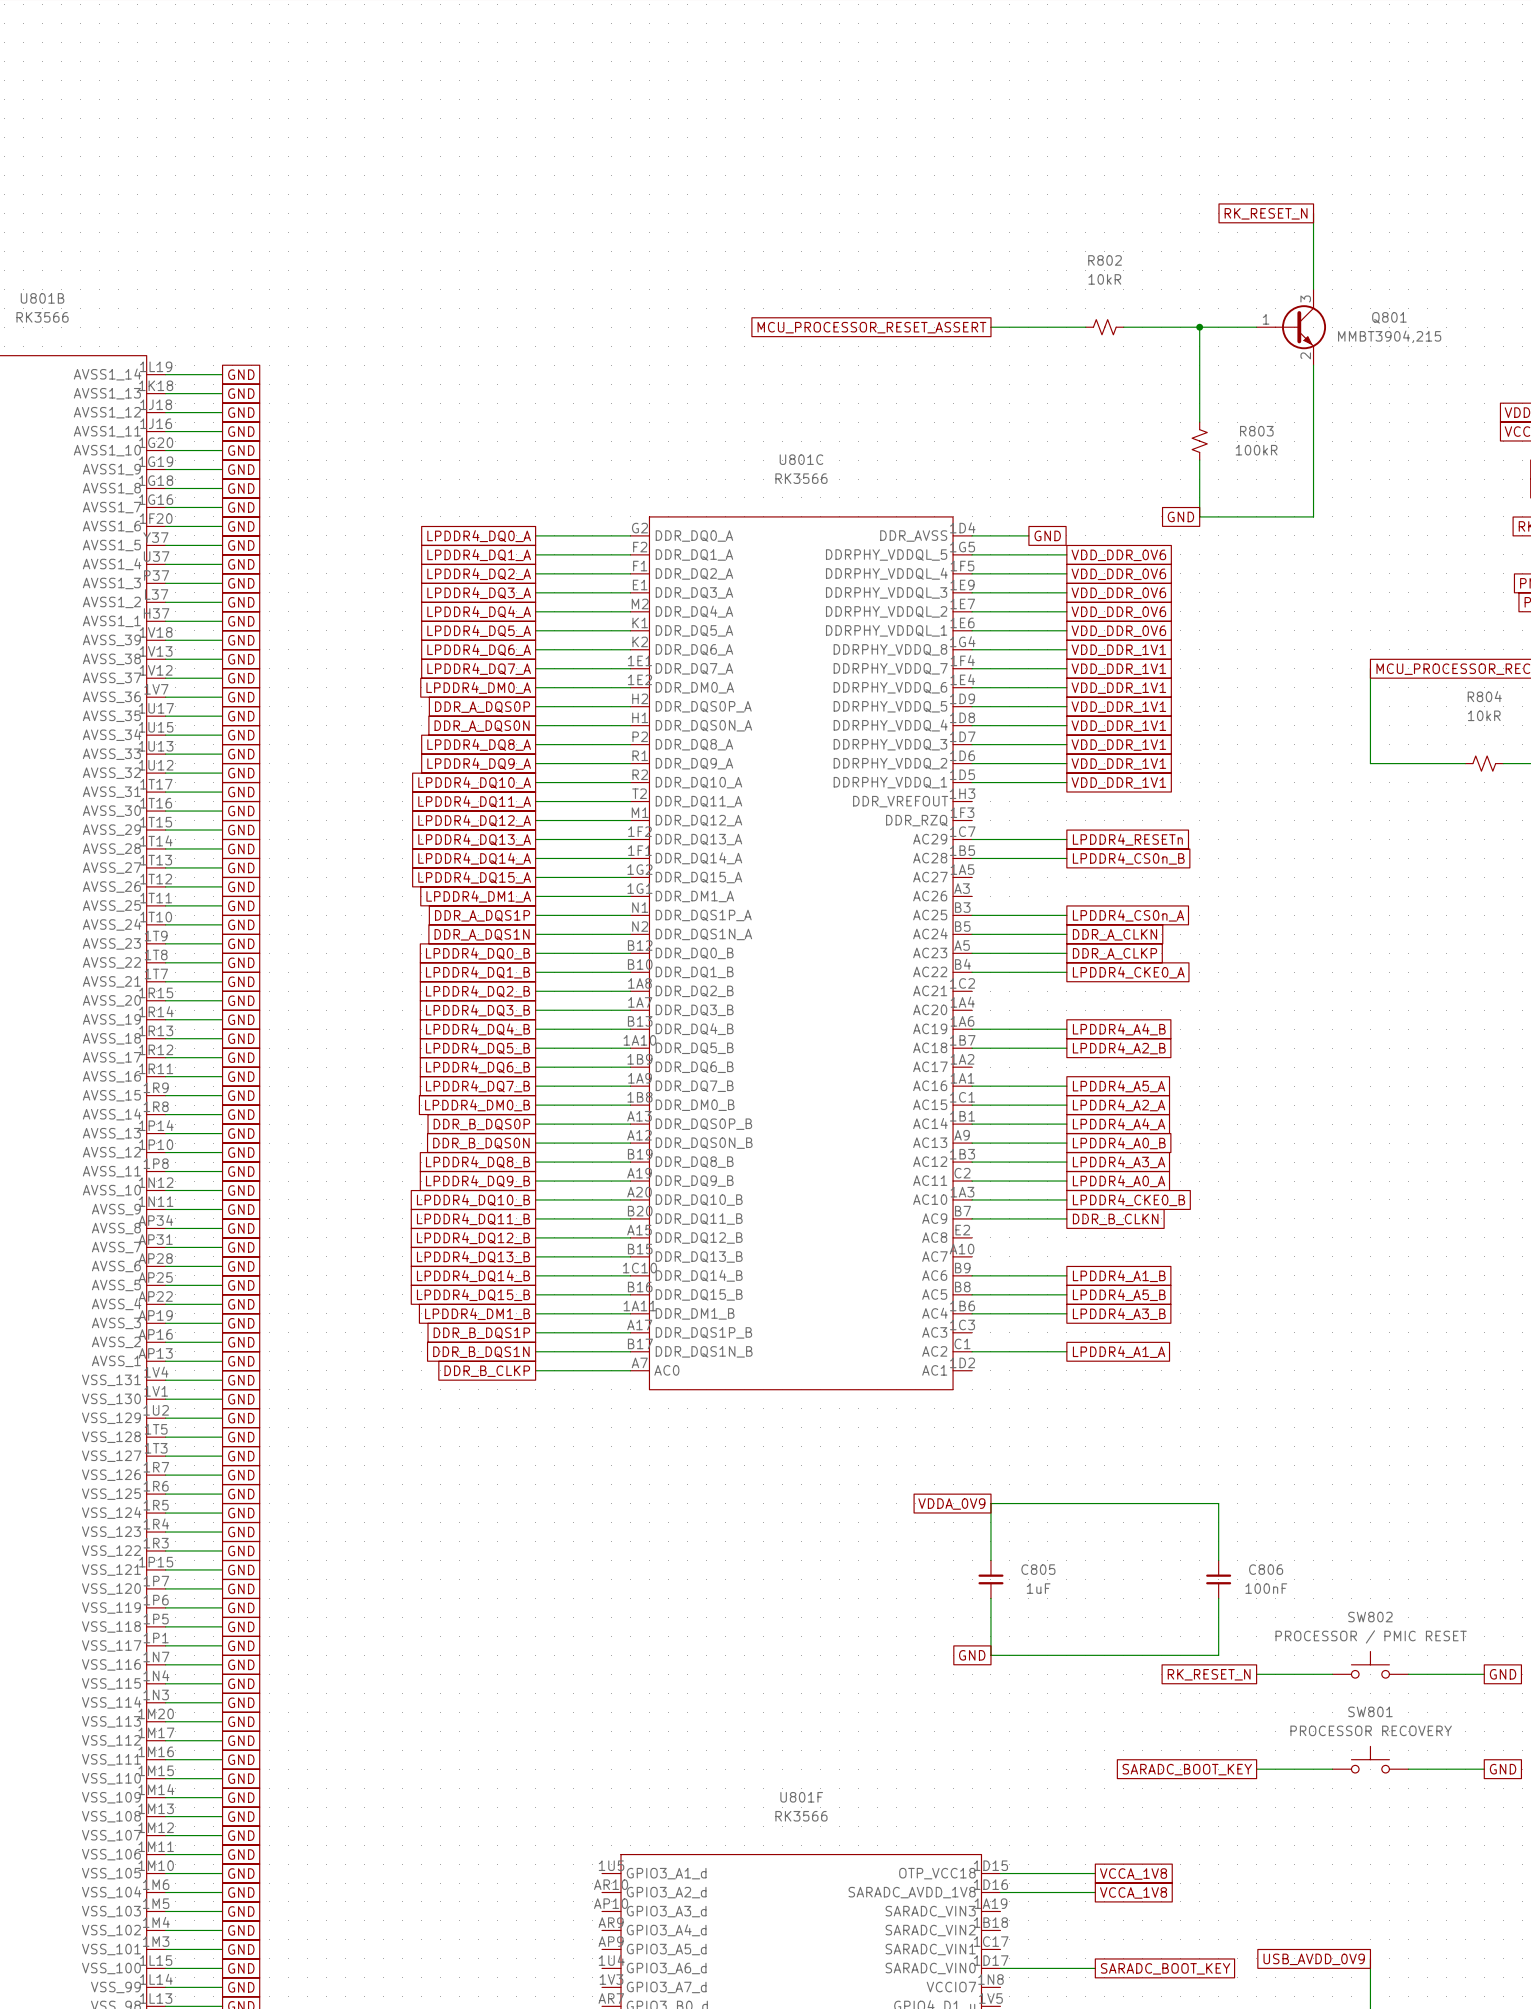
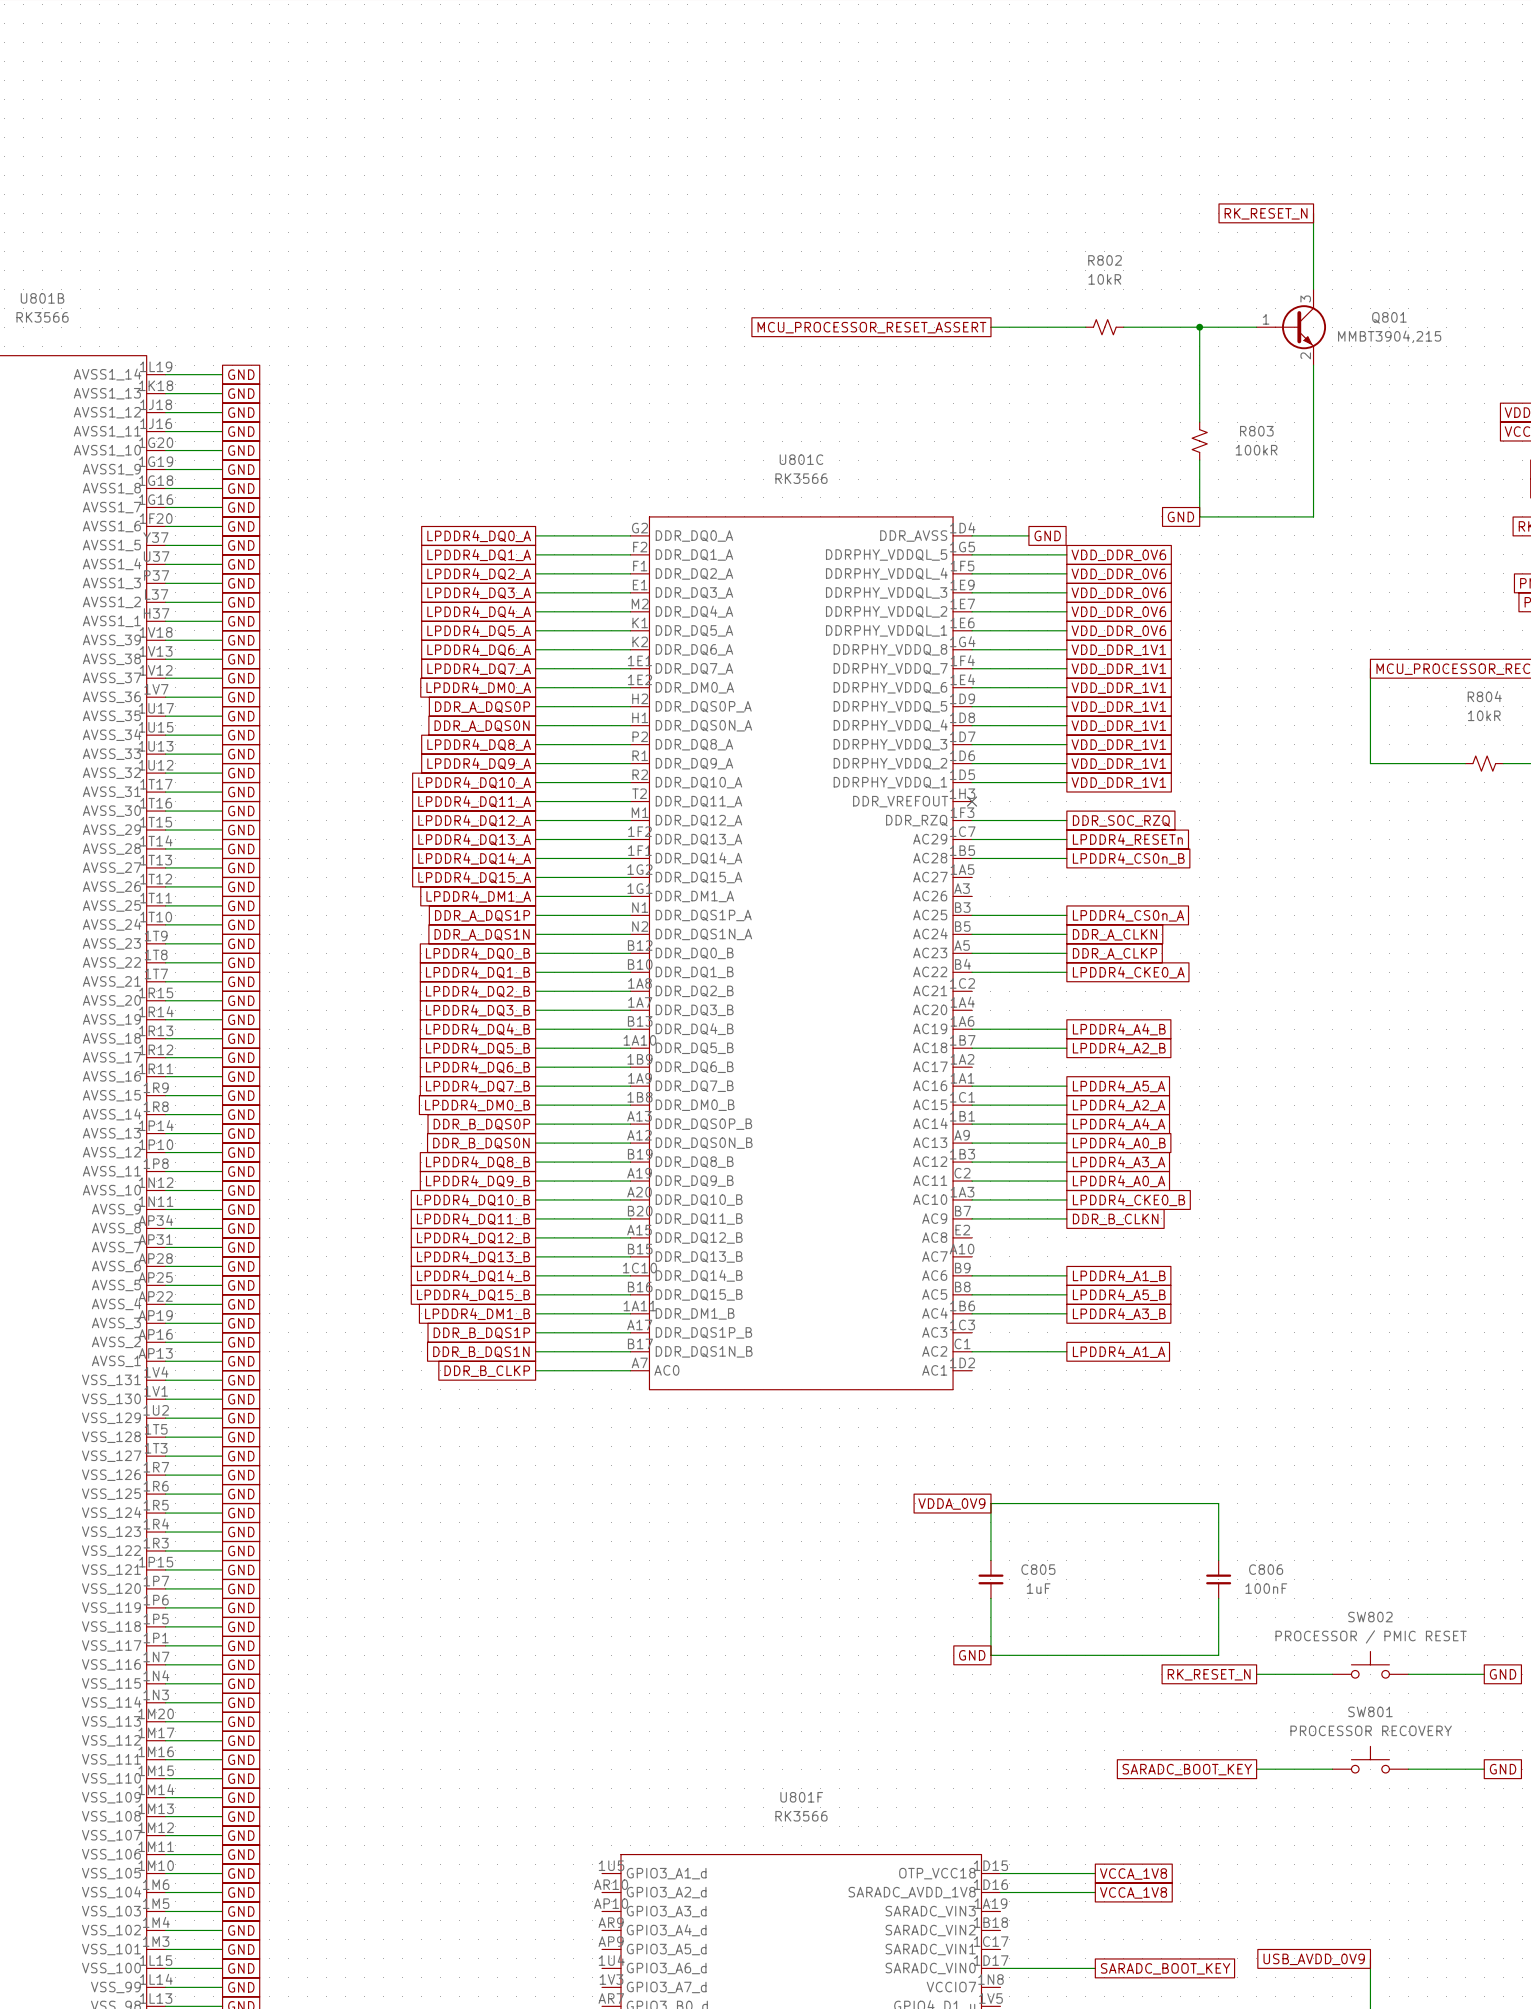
no-connect mark: none -> (972, 801)
wire: none -> (972, 820) (1066, 820)
global label: none -> DDR_SOC_RZQ (1121, 820)

